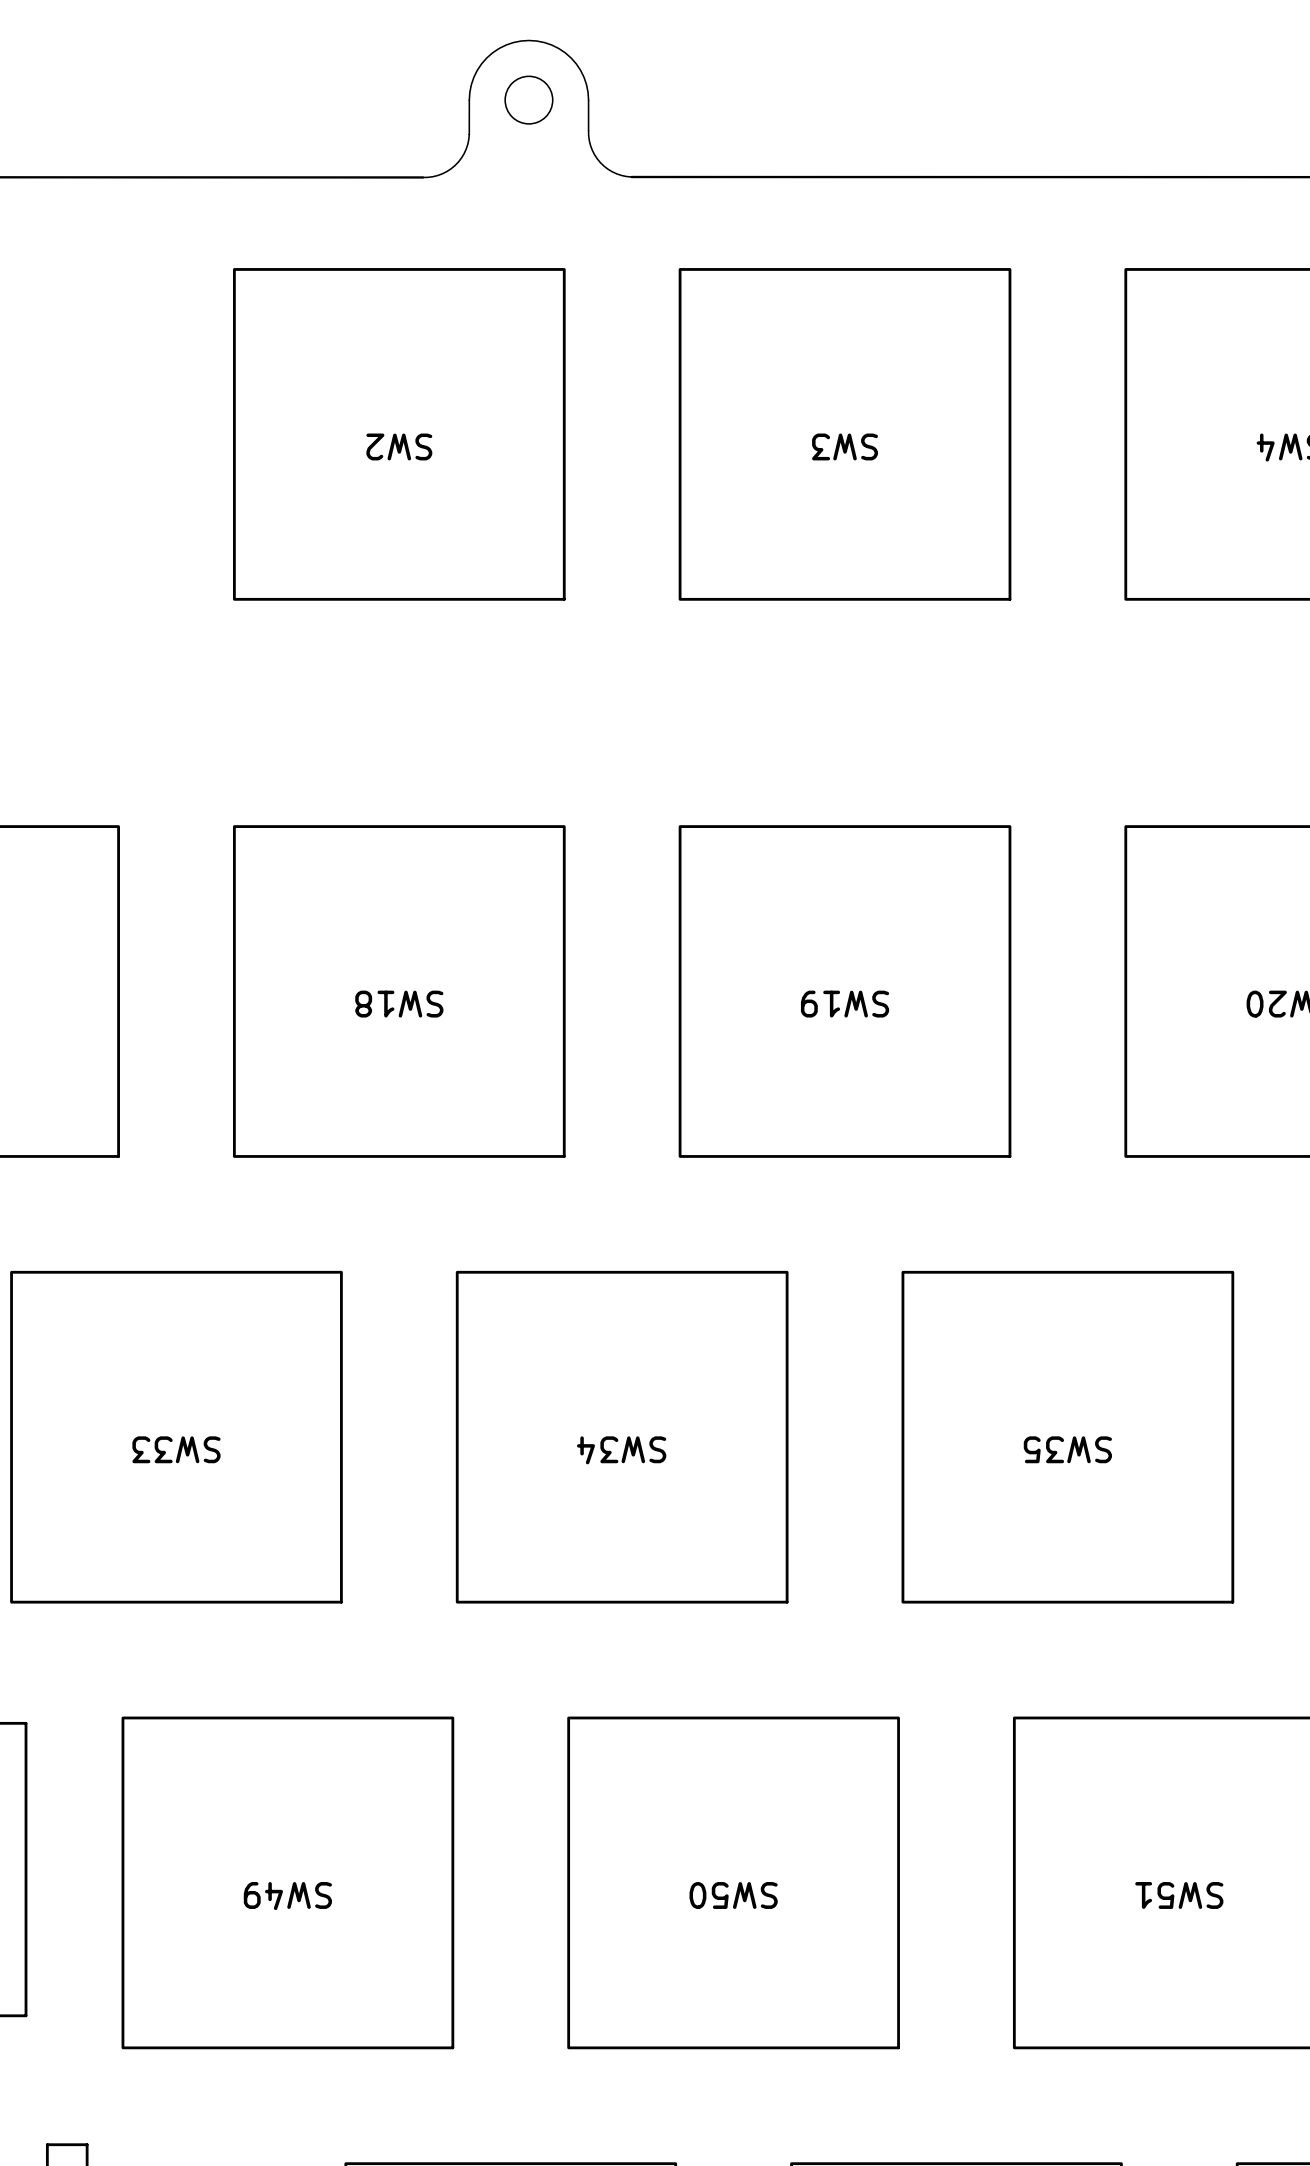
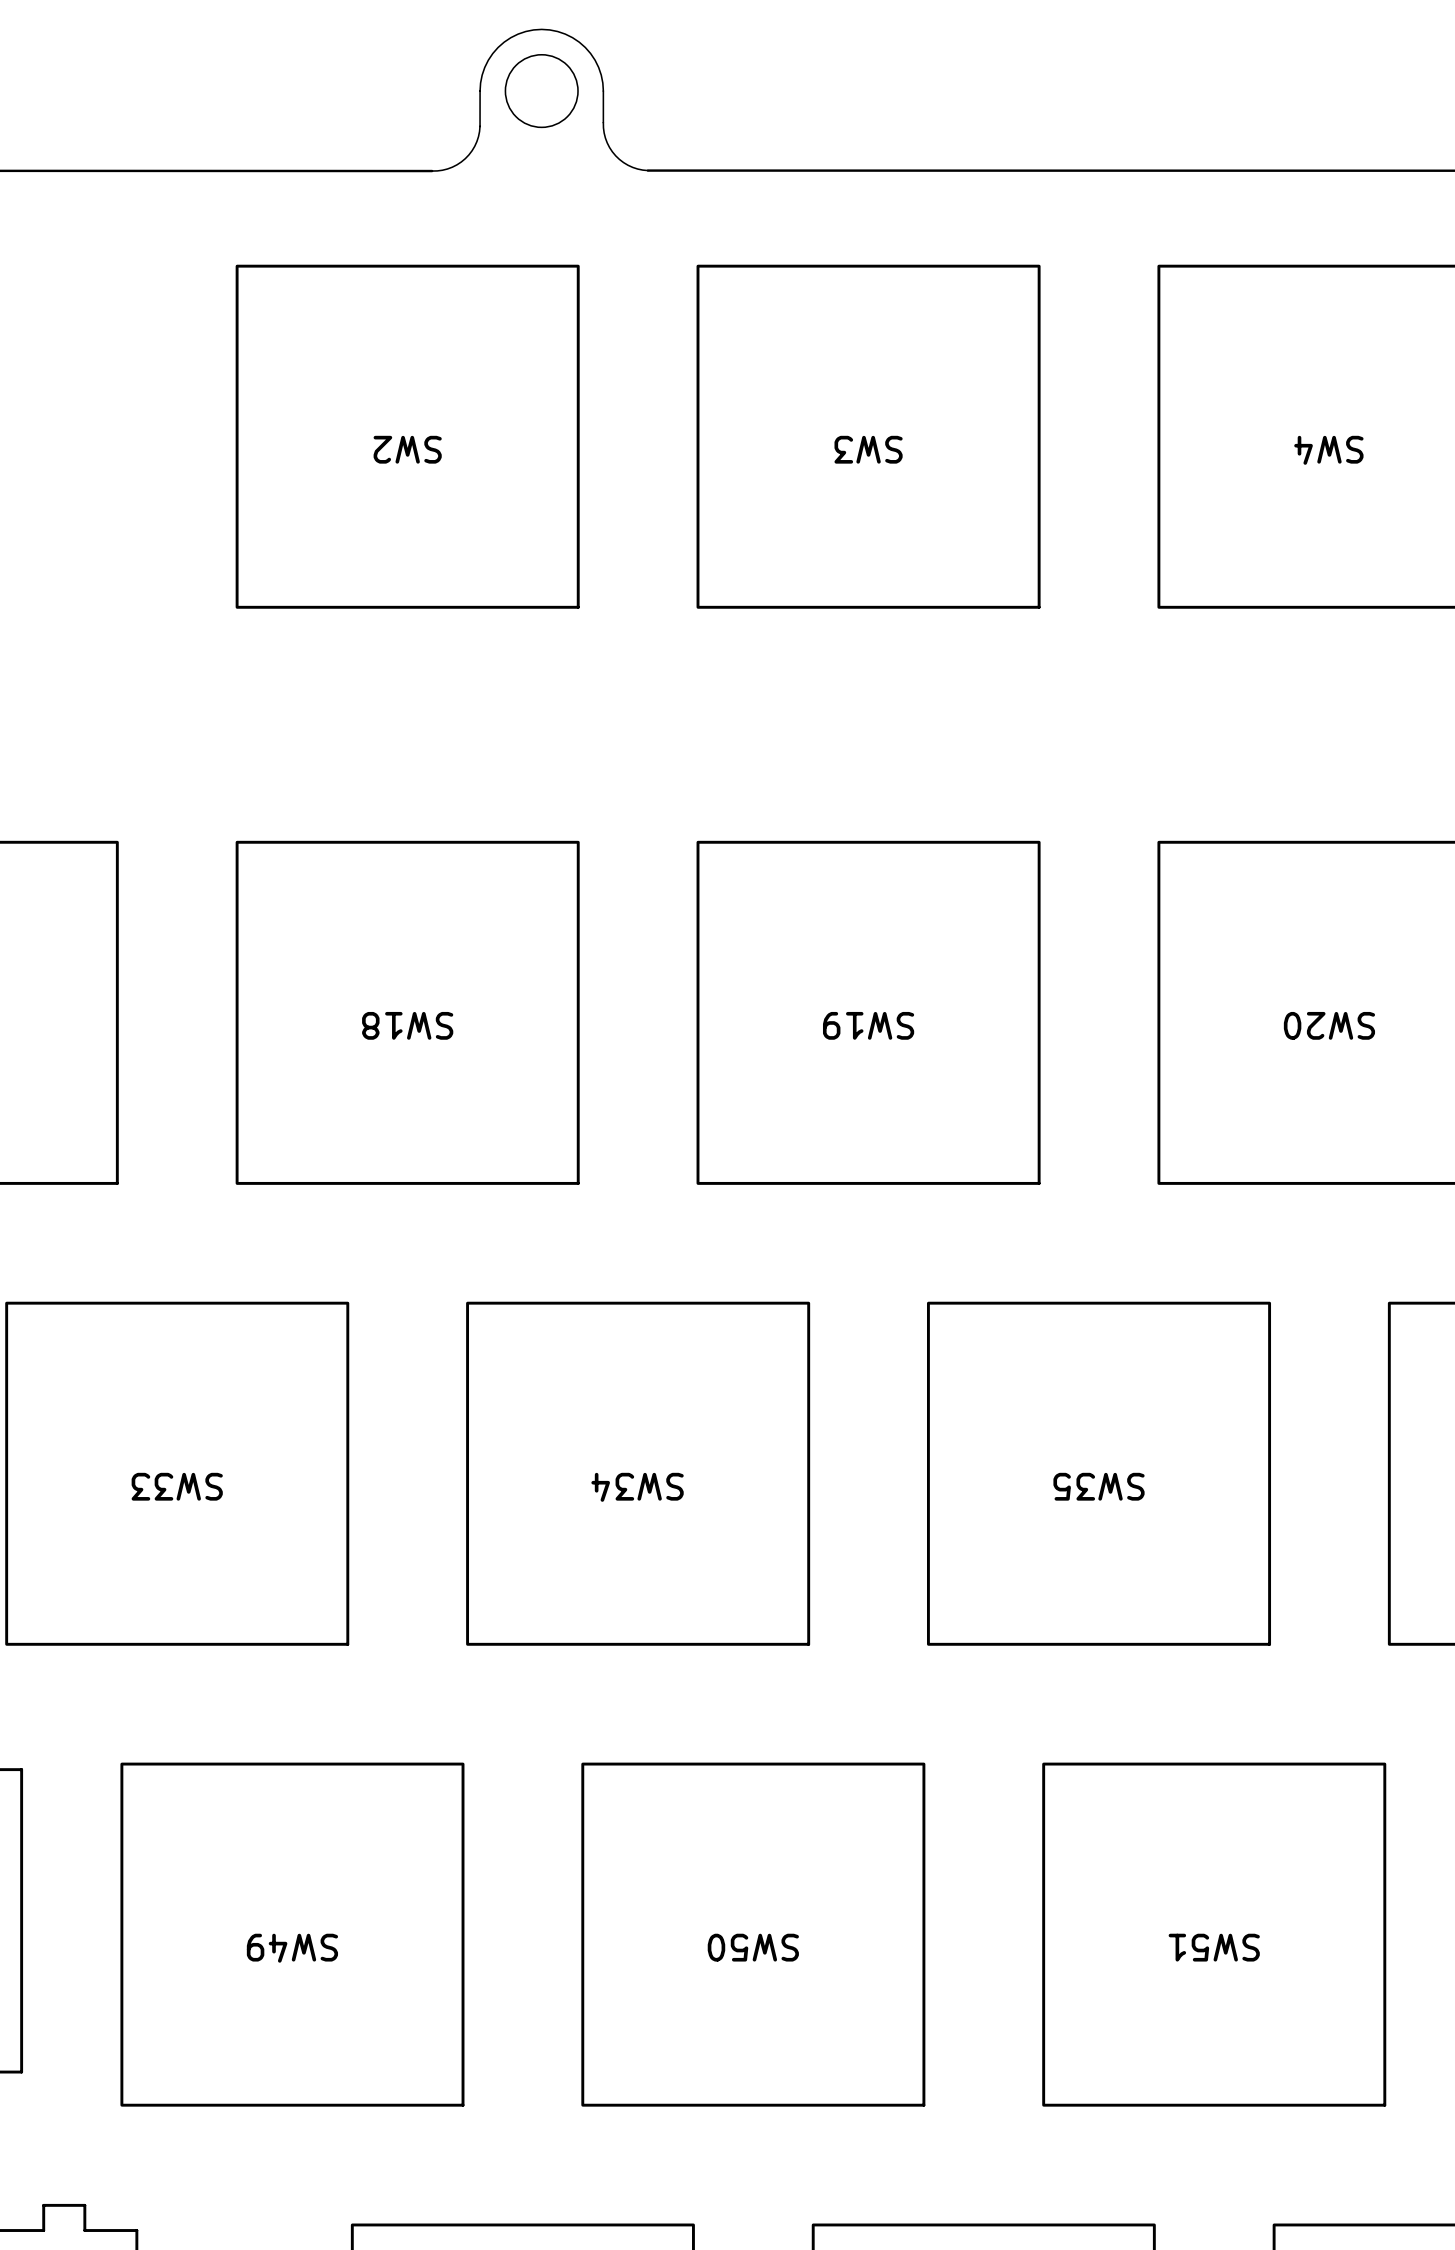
round board edge size: [504, 75, 554, 125] -> [504, 54, 579, 128]

